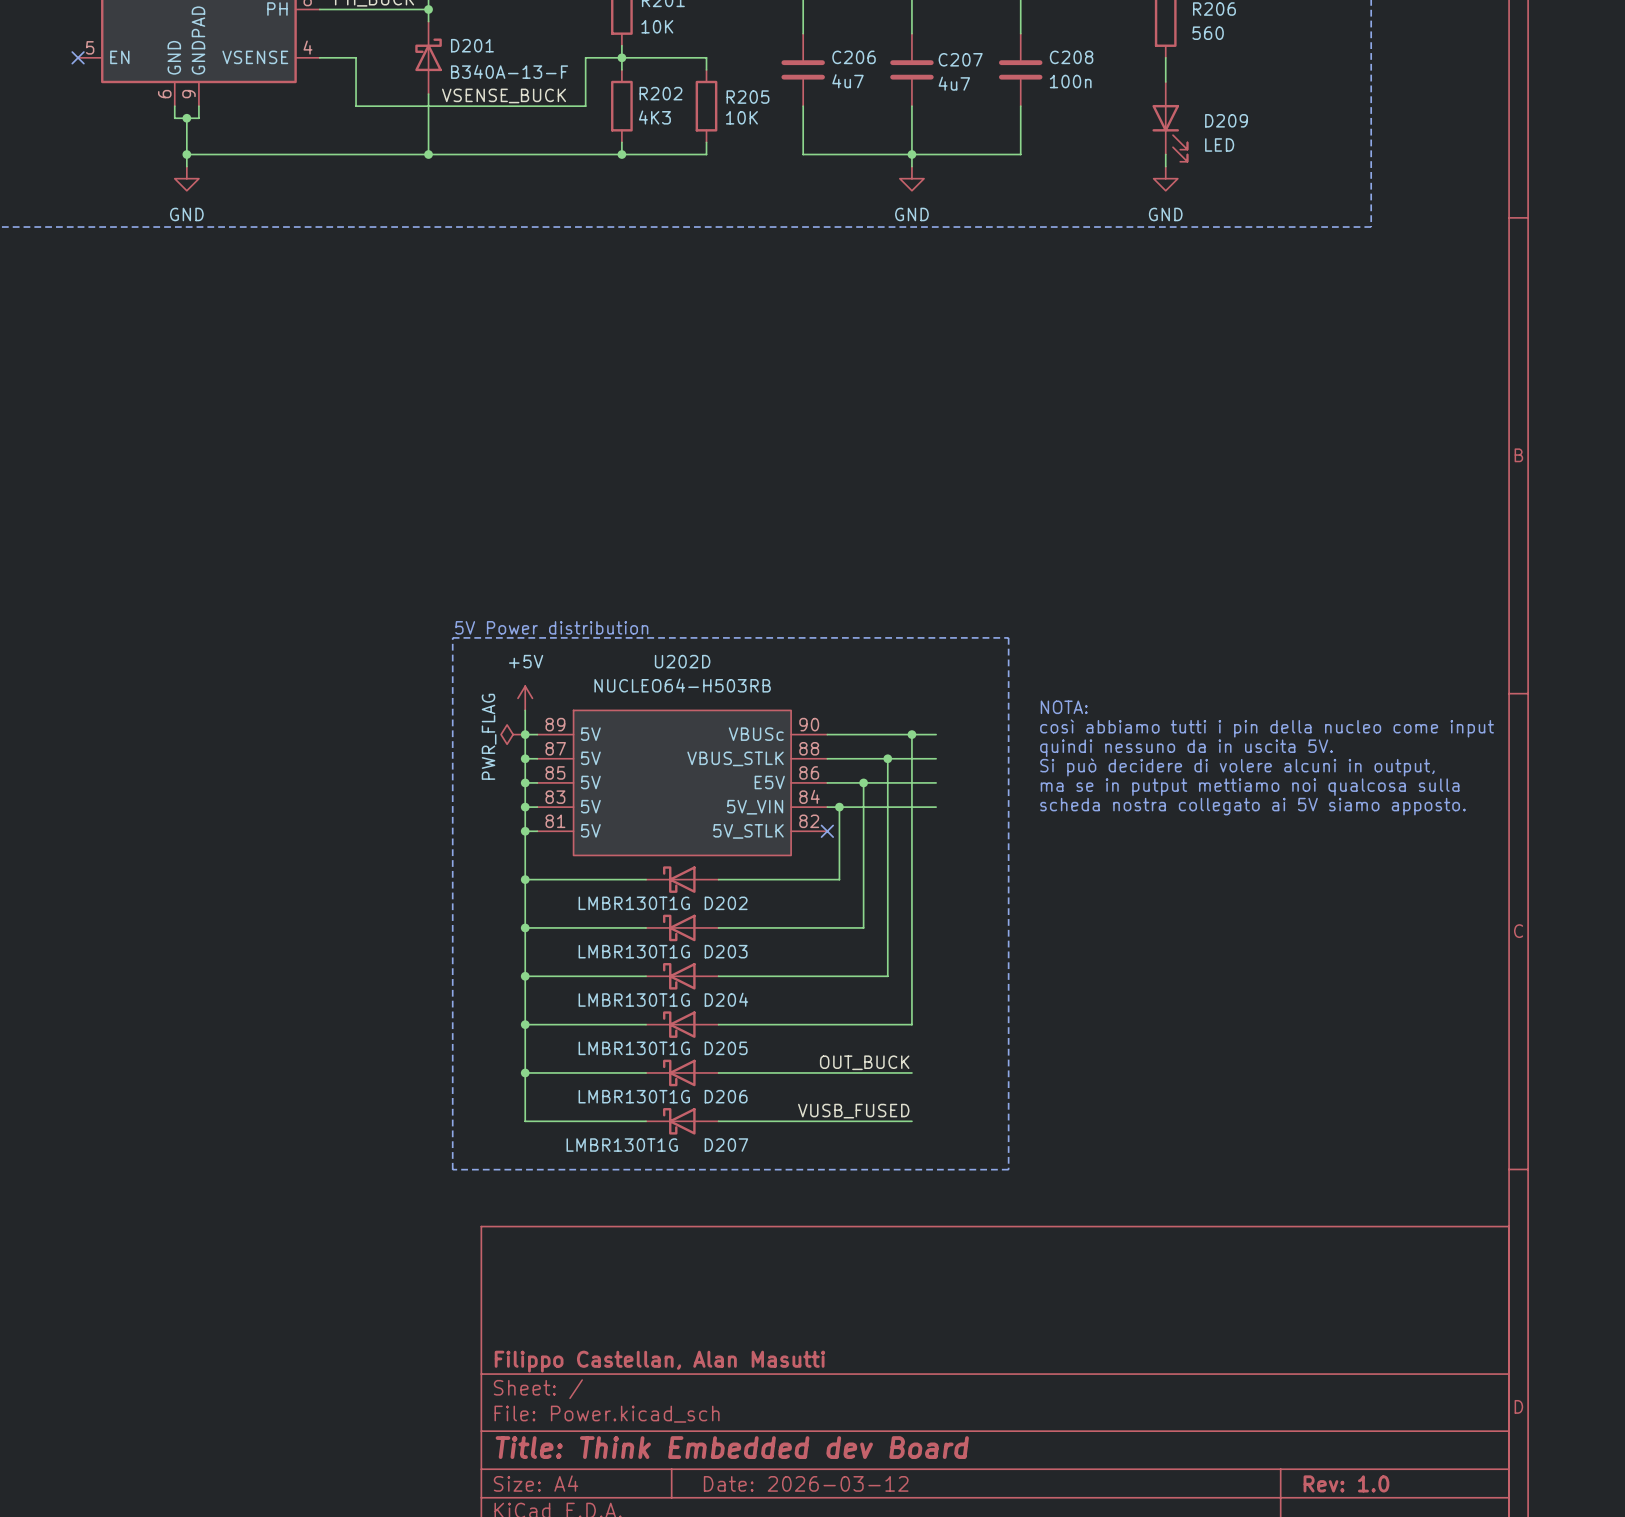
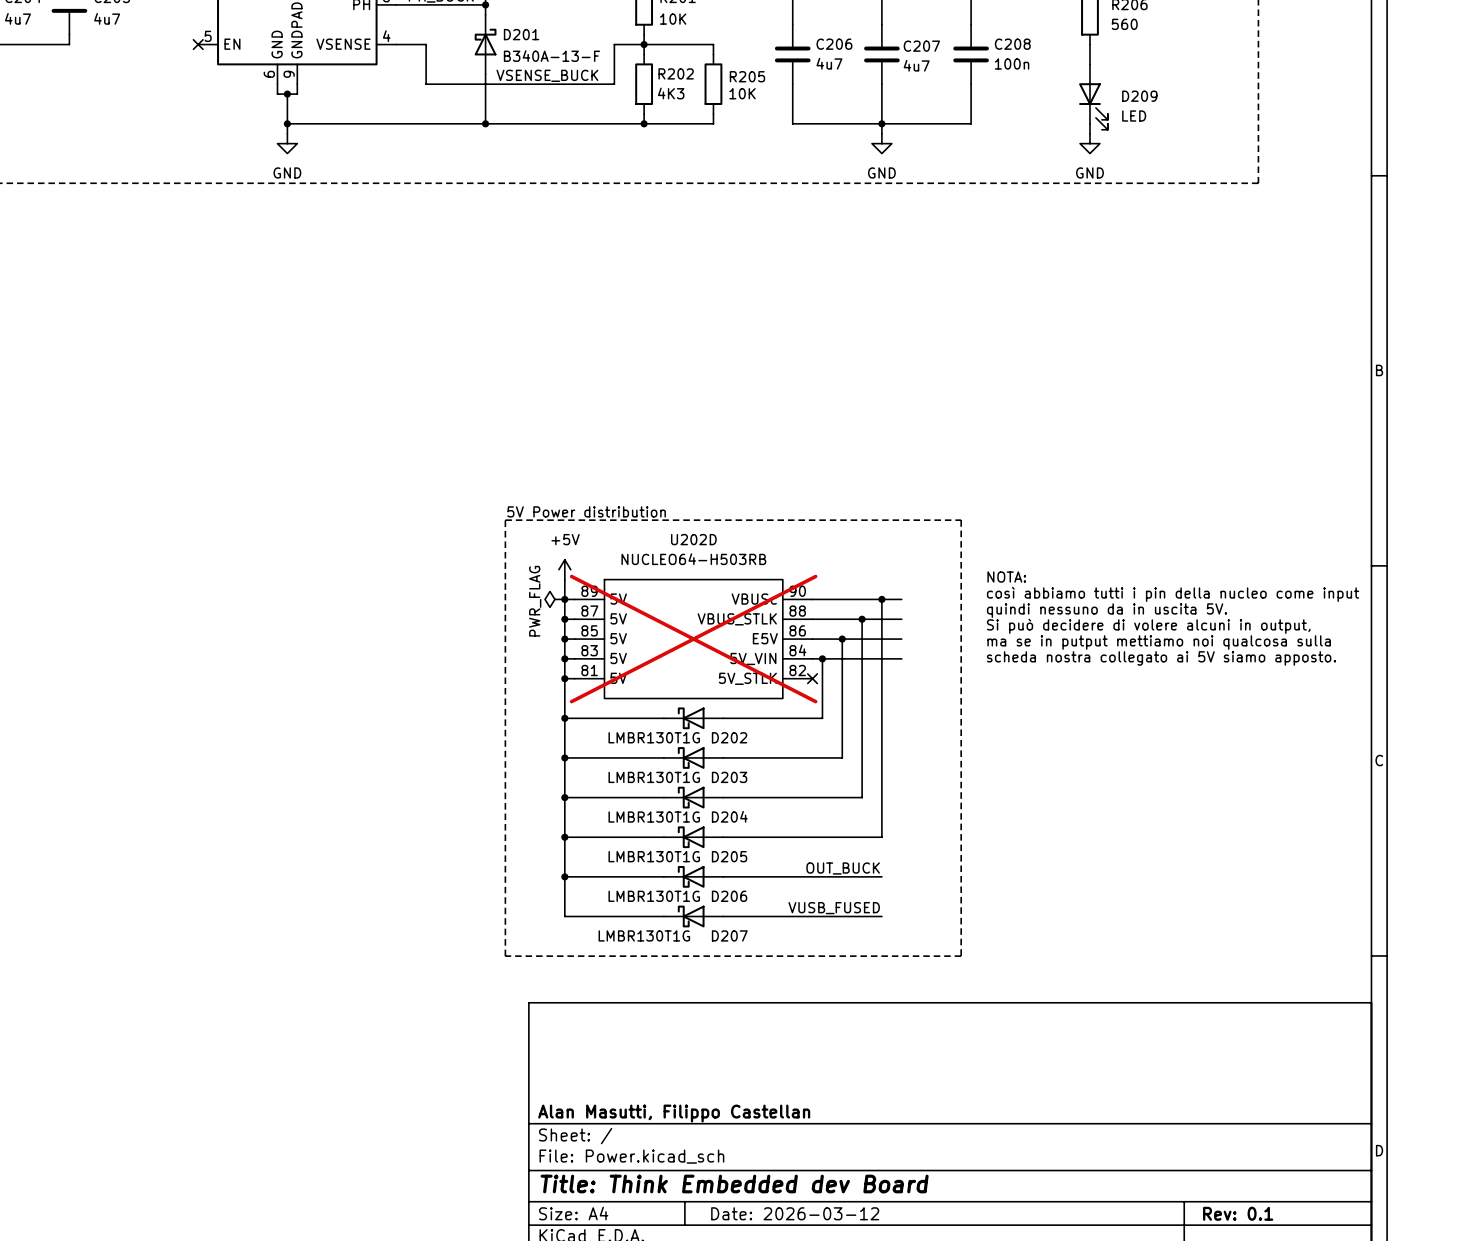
U202D do-not-place cross: none -> (693, 639)
title block: Filippo Castellan, Alan Masutti (659, 1361) -> Alan Masutti, Filippo Castellan (674, 1113)
title block: Rev: 1.0 (1346, 1483) -> Rev: 0.1 (1238, 1213)

